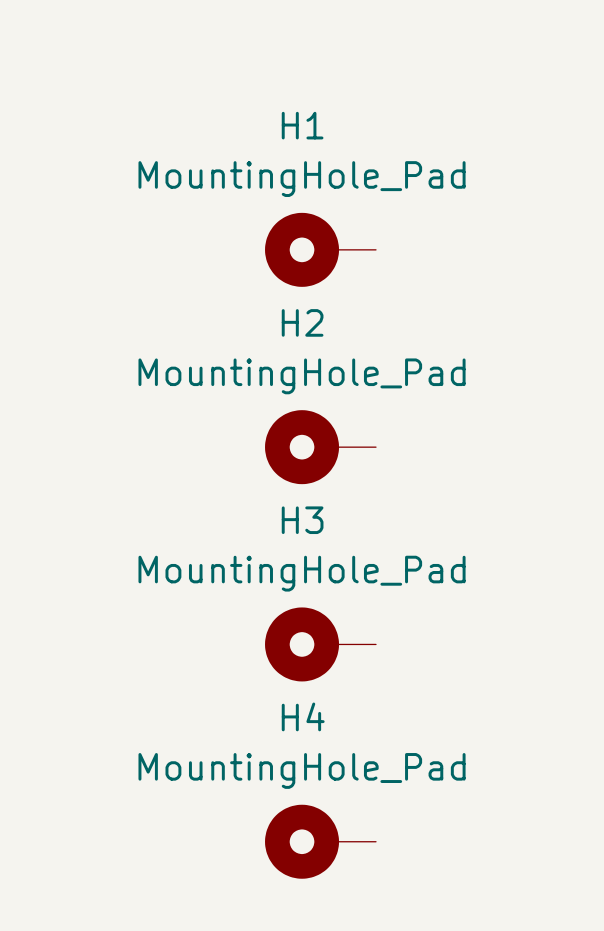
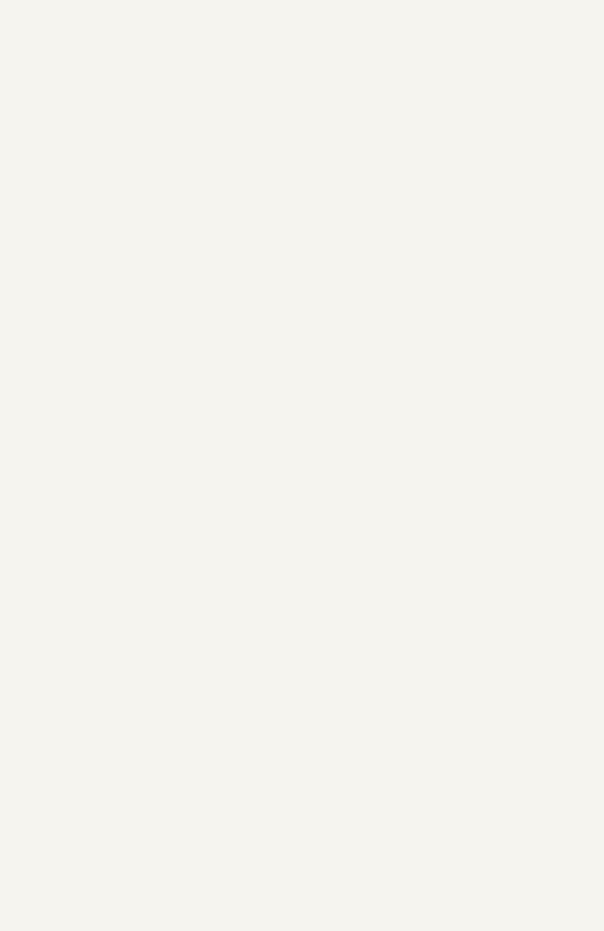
H1: MountingHole_Pad (320, 249) -> none
H2: MountingHole_Pad (320, 447) -> none
H3: MountingHole_Pad (320, 644) -> none
H4: MountingHole_Pad (320, 841) -> none

